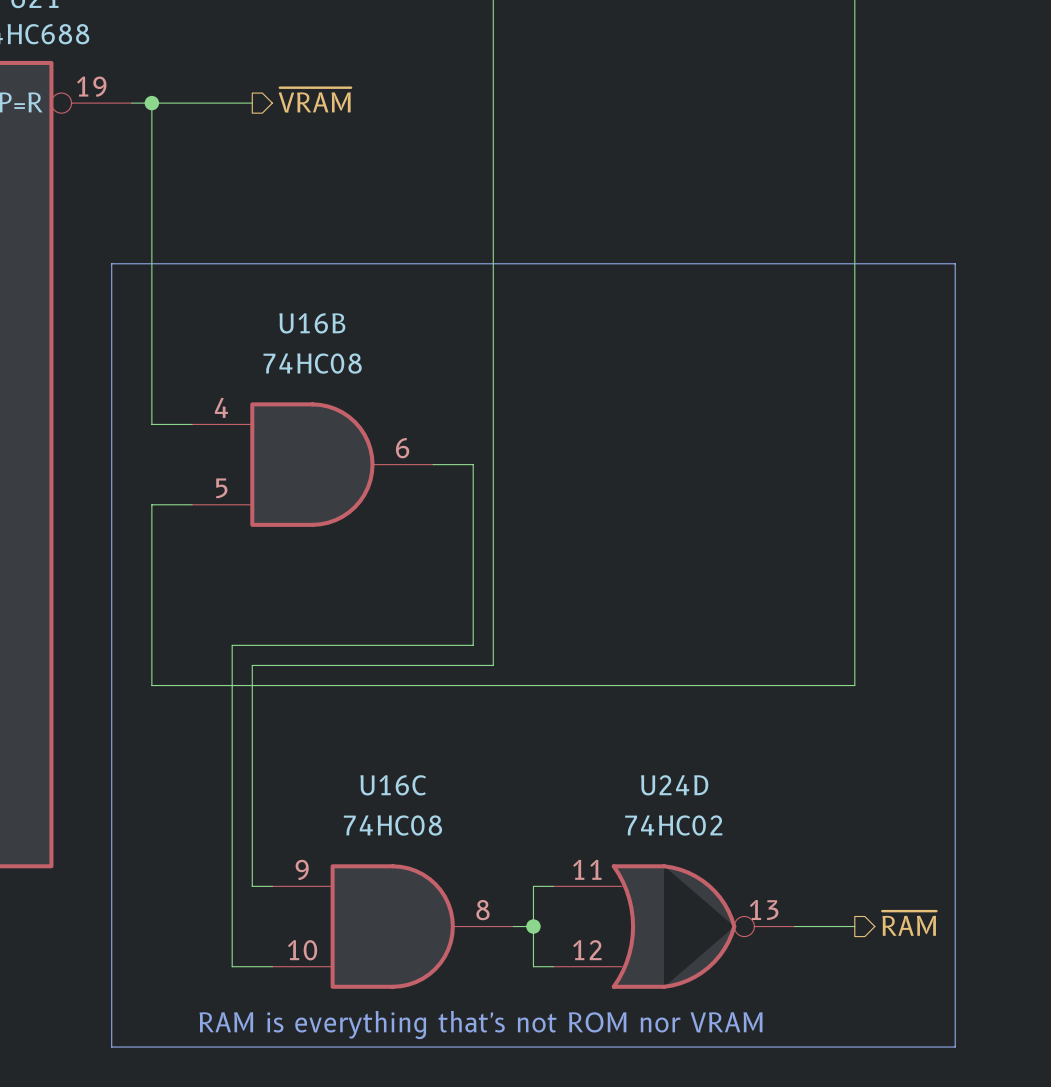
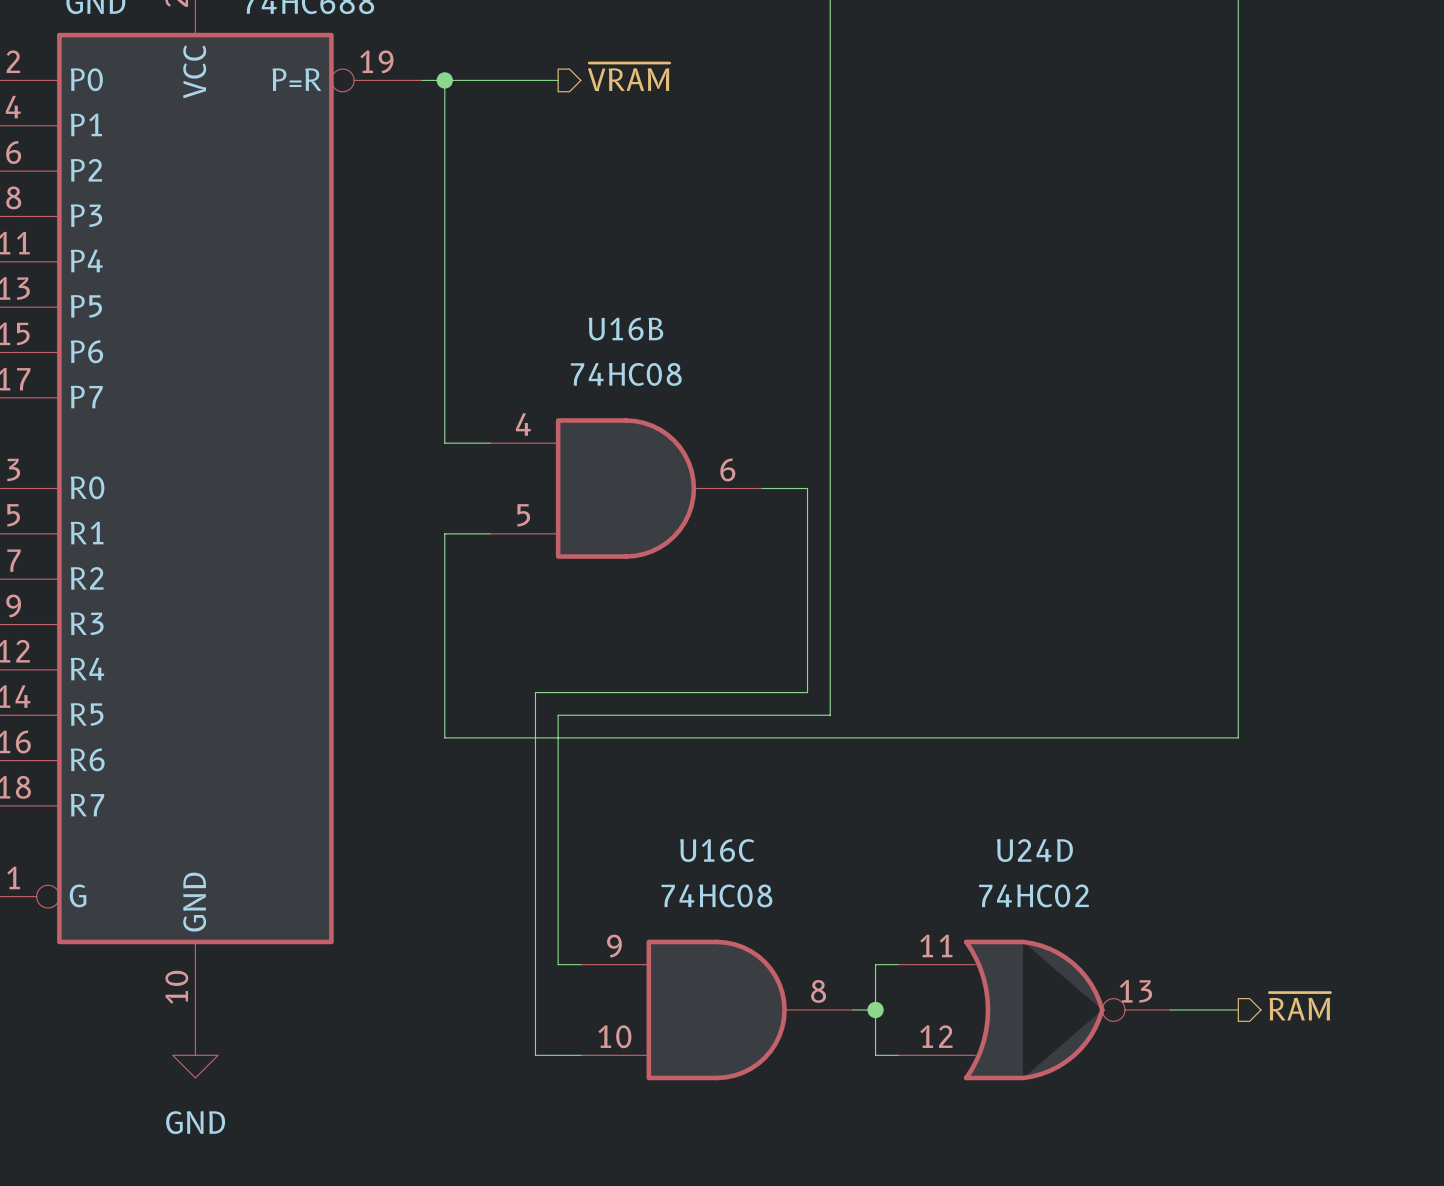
line: (111, 263) (955, 263) (955, 1047) (111, 1047) (111, 263) -> none
text: RAM is everything that's not ROM nor VRAM (481, 1025) -> none

